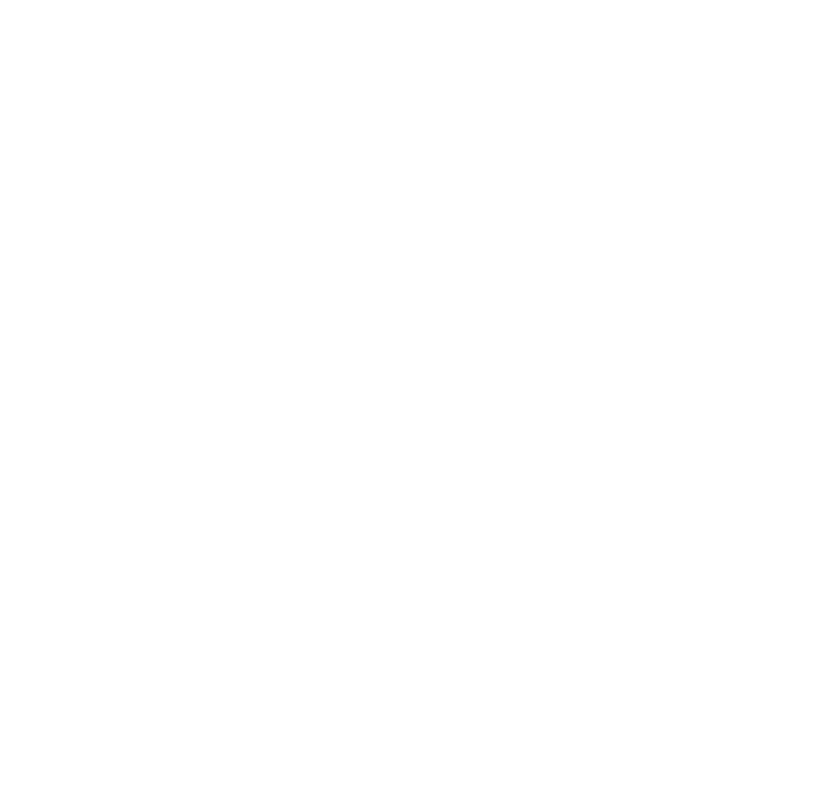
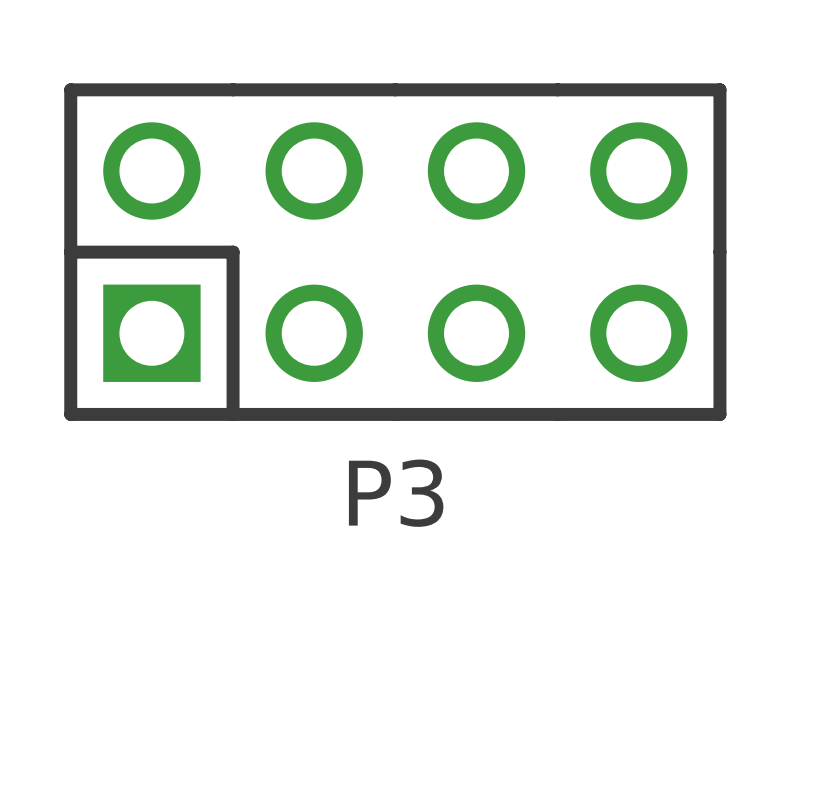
P3: none -> (395, 252)

